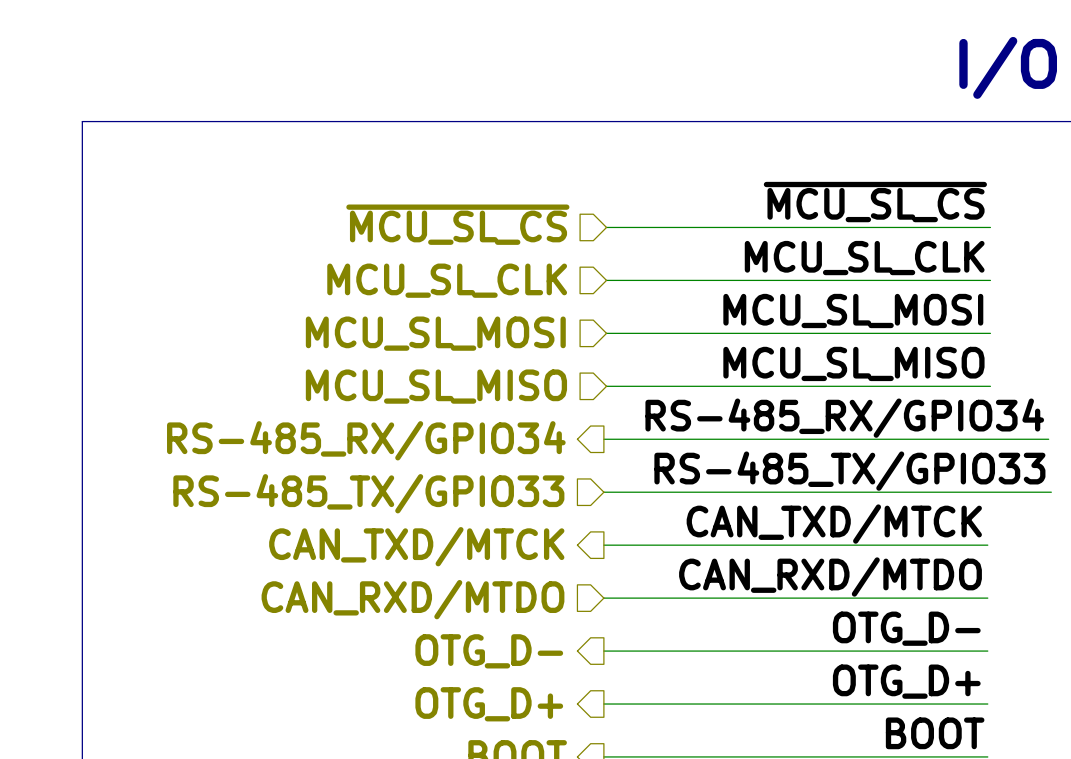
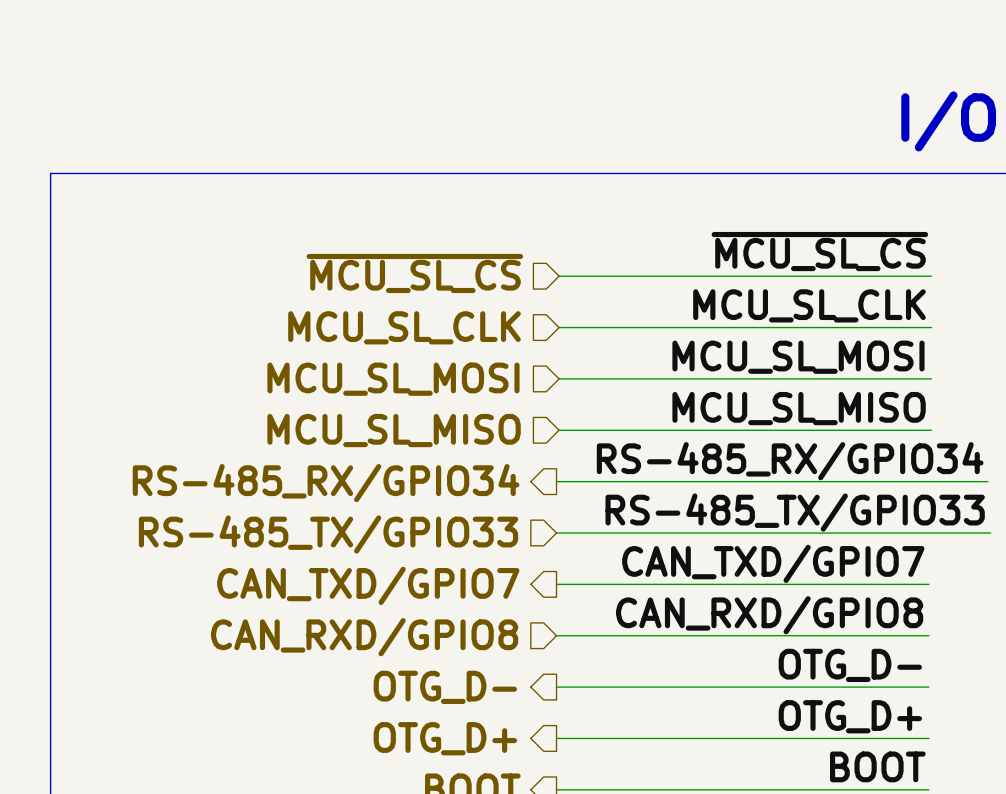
label: CAN_TXD/MTCK (834, 524) -> CAN_TXD/GPIO7 (773, 563)
hierarchical label: CAN_TXD/MTCK (416, 546) -> CAN_TXD/GPIO7 (368, 585)
label: CAN_RXD/MTDO (830, 577) -> CAN_RXD/GPIO8 (769, 615)
hierarchical label: CAN_RXD/MTDO (412, 599) -> CAN_RXD/GPIO8 (364, 637)

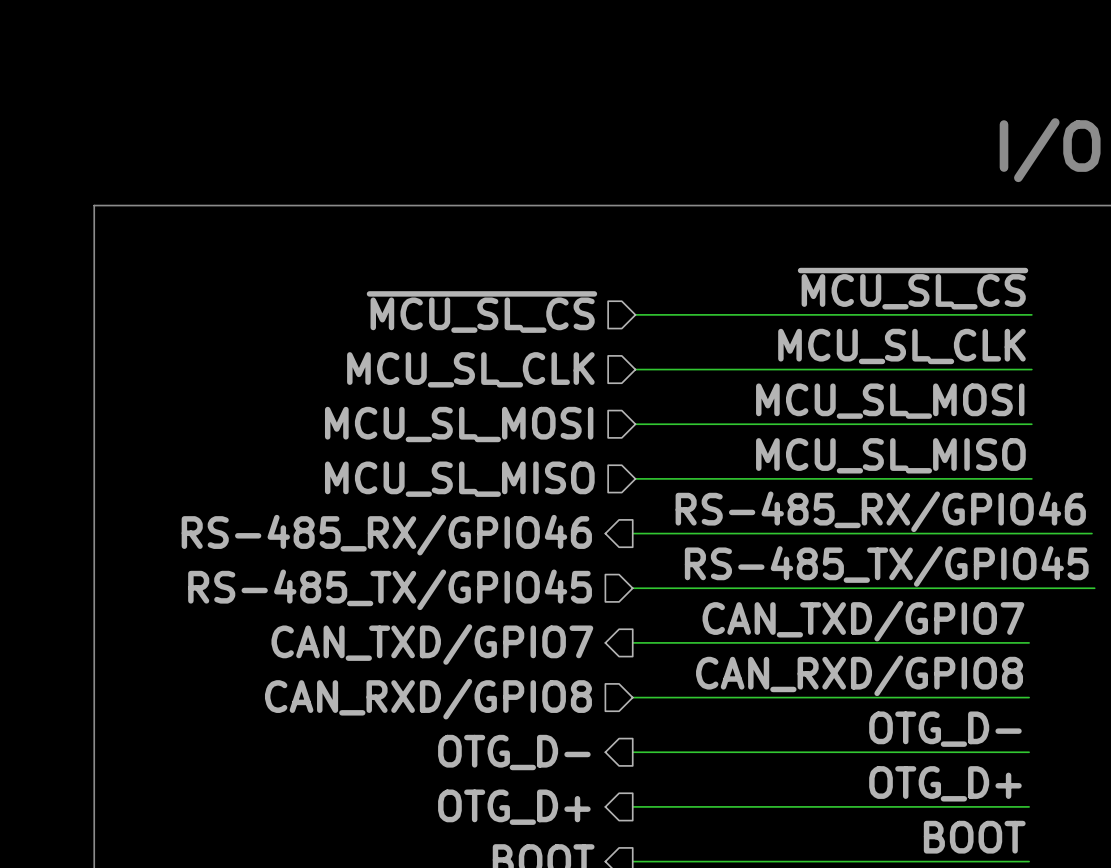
label: RS-485_RX/GPIO34 (790, 461) -> RS-485_RX/GPIO46 (880, 511)
hierarchical label: RS-485_RX/GPIO34 (326, 483) -> RS-485_RX/GPIO46 (386, 535)
label: RS-485_TX/GPIO33 (795, 512) -> RS-485_TX/GPIO45 (886, 566)
hierarchical label: RS-485_TX/GPIO33 (328, 534) -> RS-485_TX/GPIO45 (390, 589)

